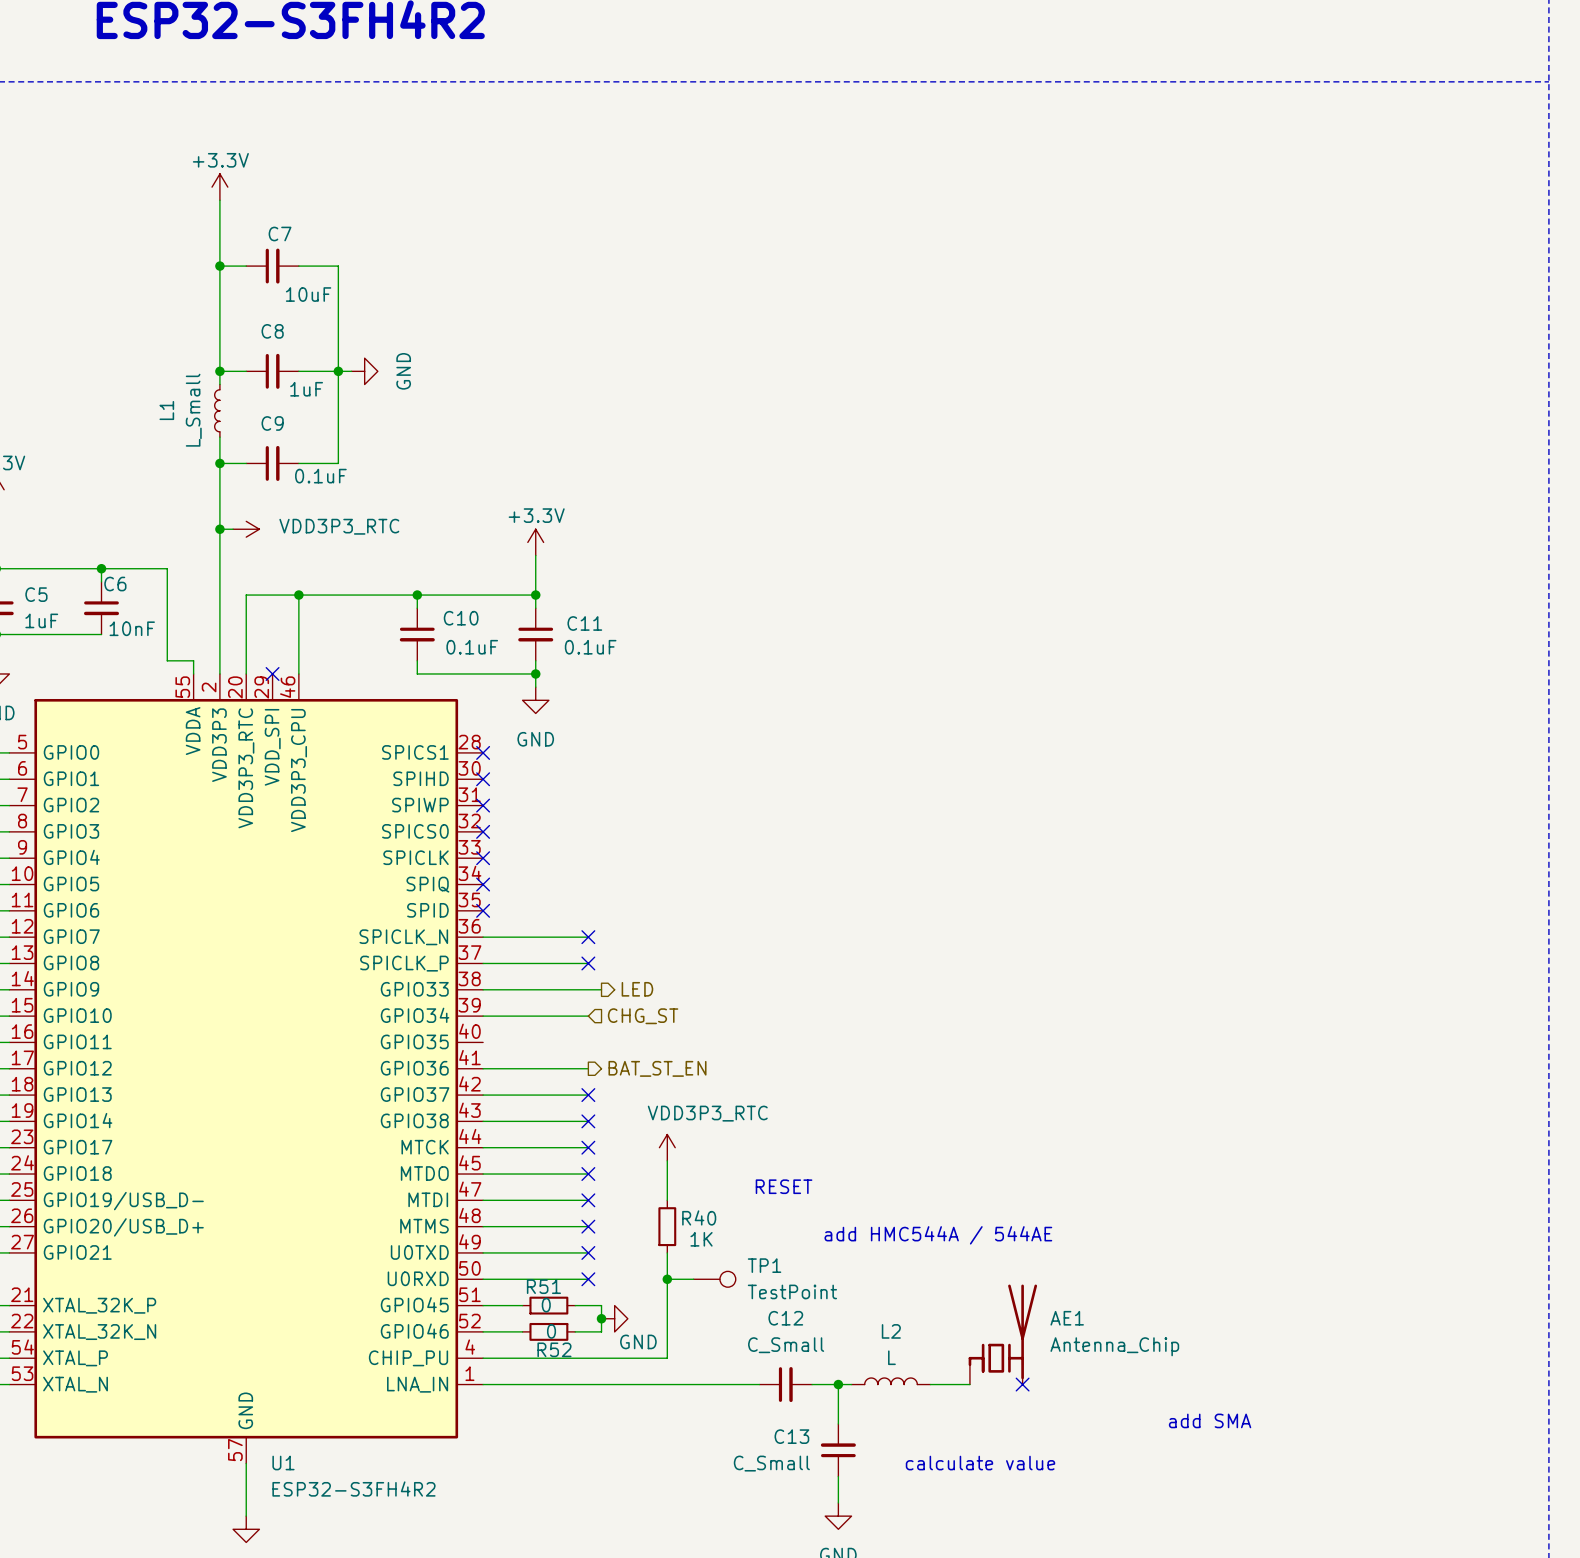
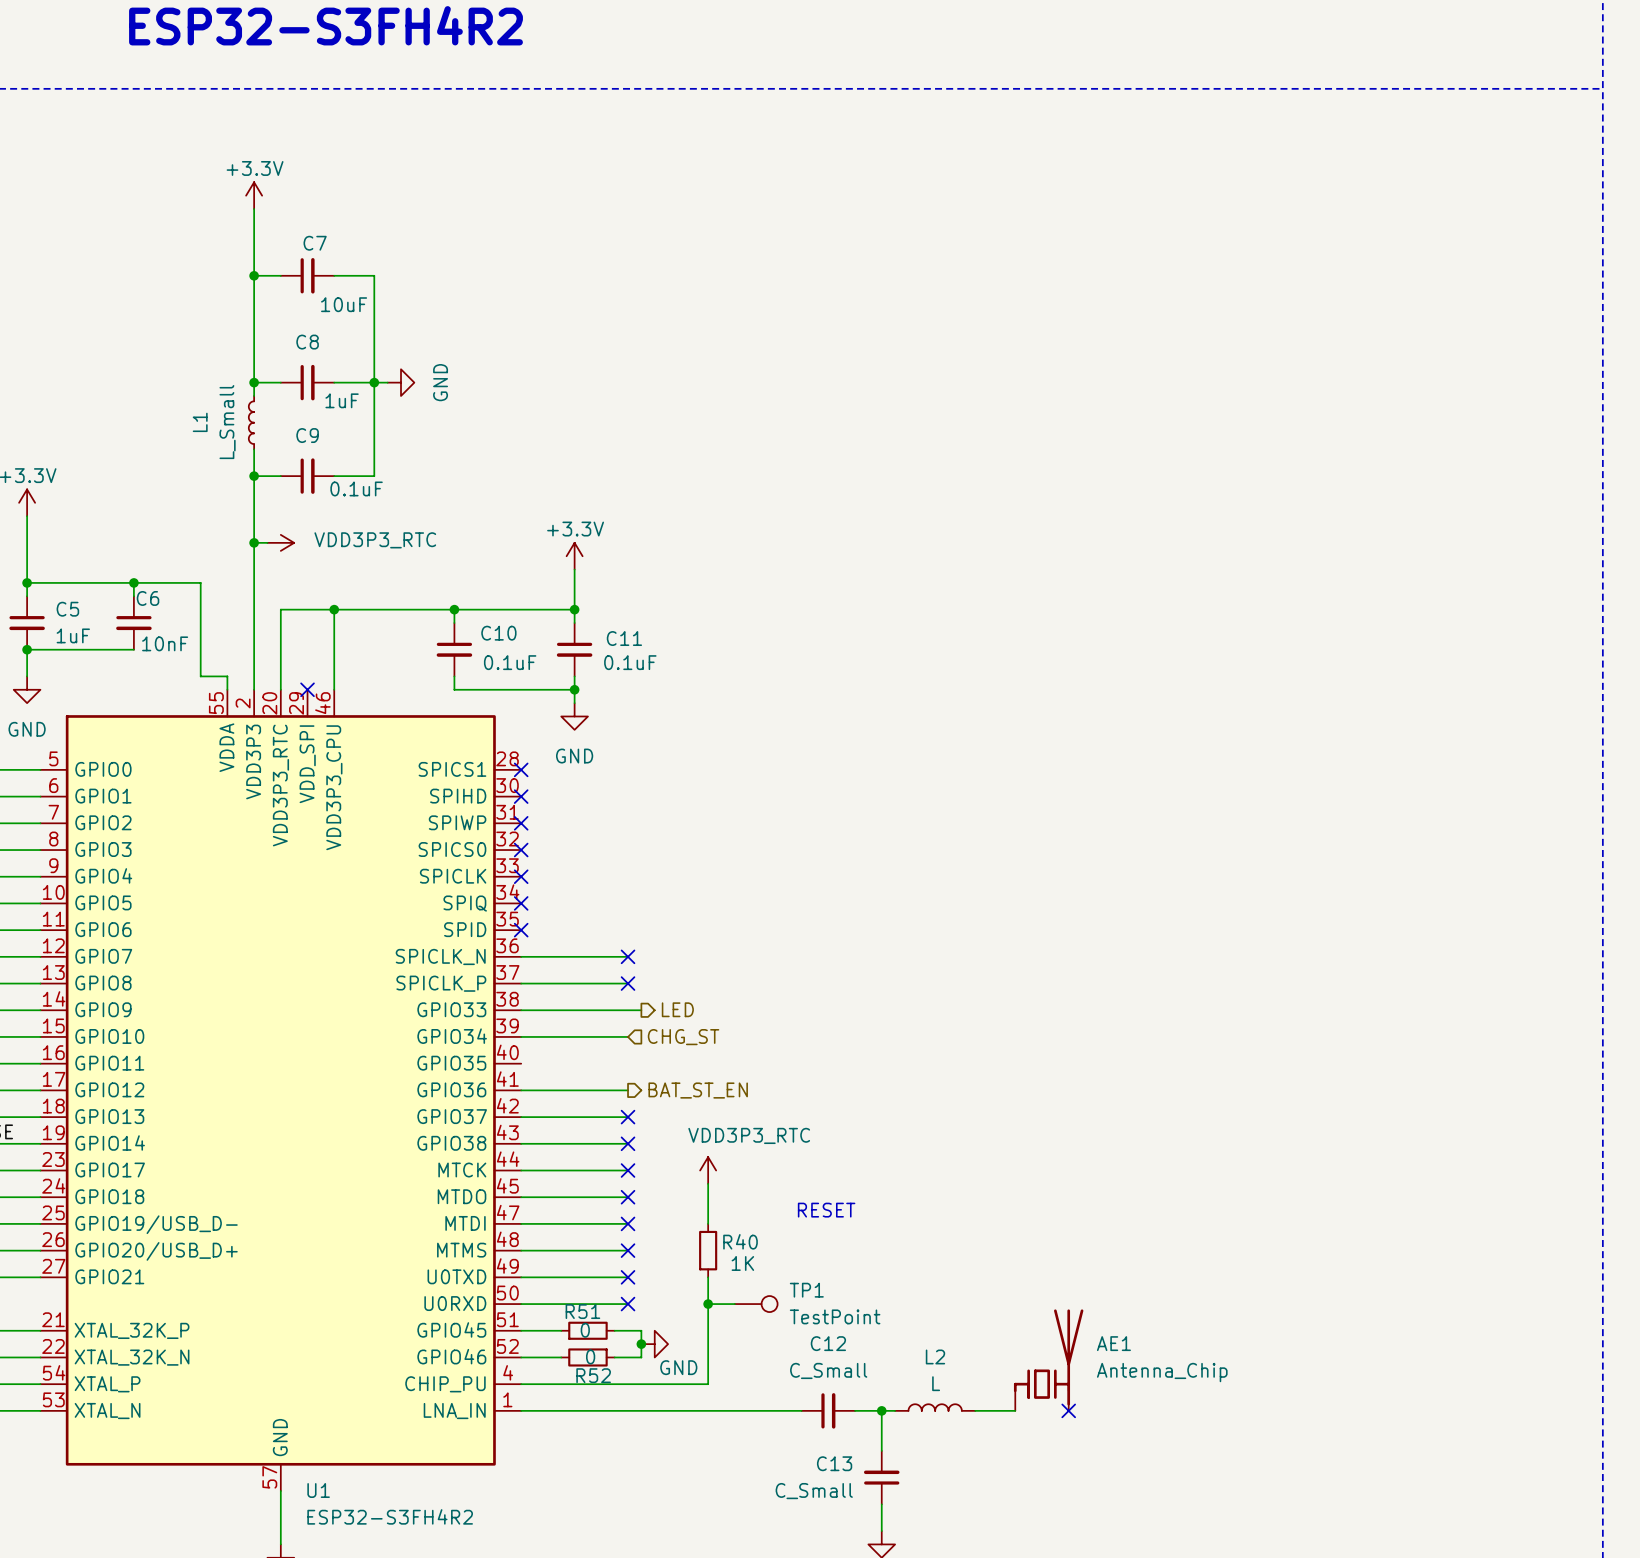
text: add HMC544A / 544AE (938, 1235) -> none
text: add SMA (1210, 1420) -> none
text: calculate value (980, 1463) -> none

